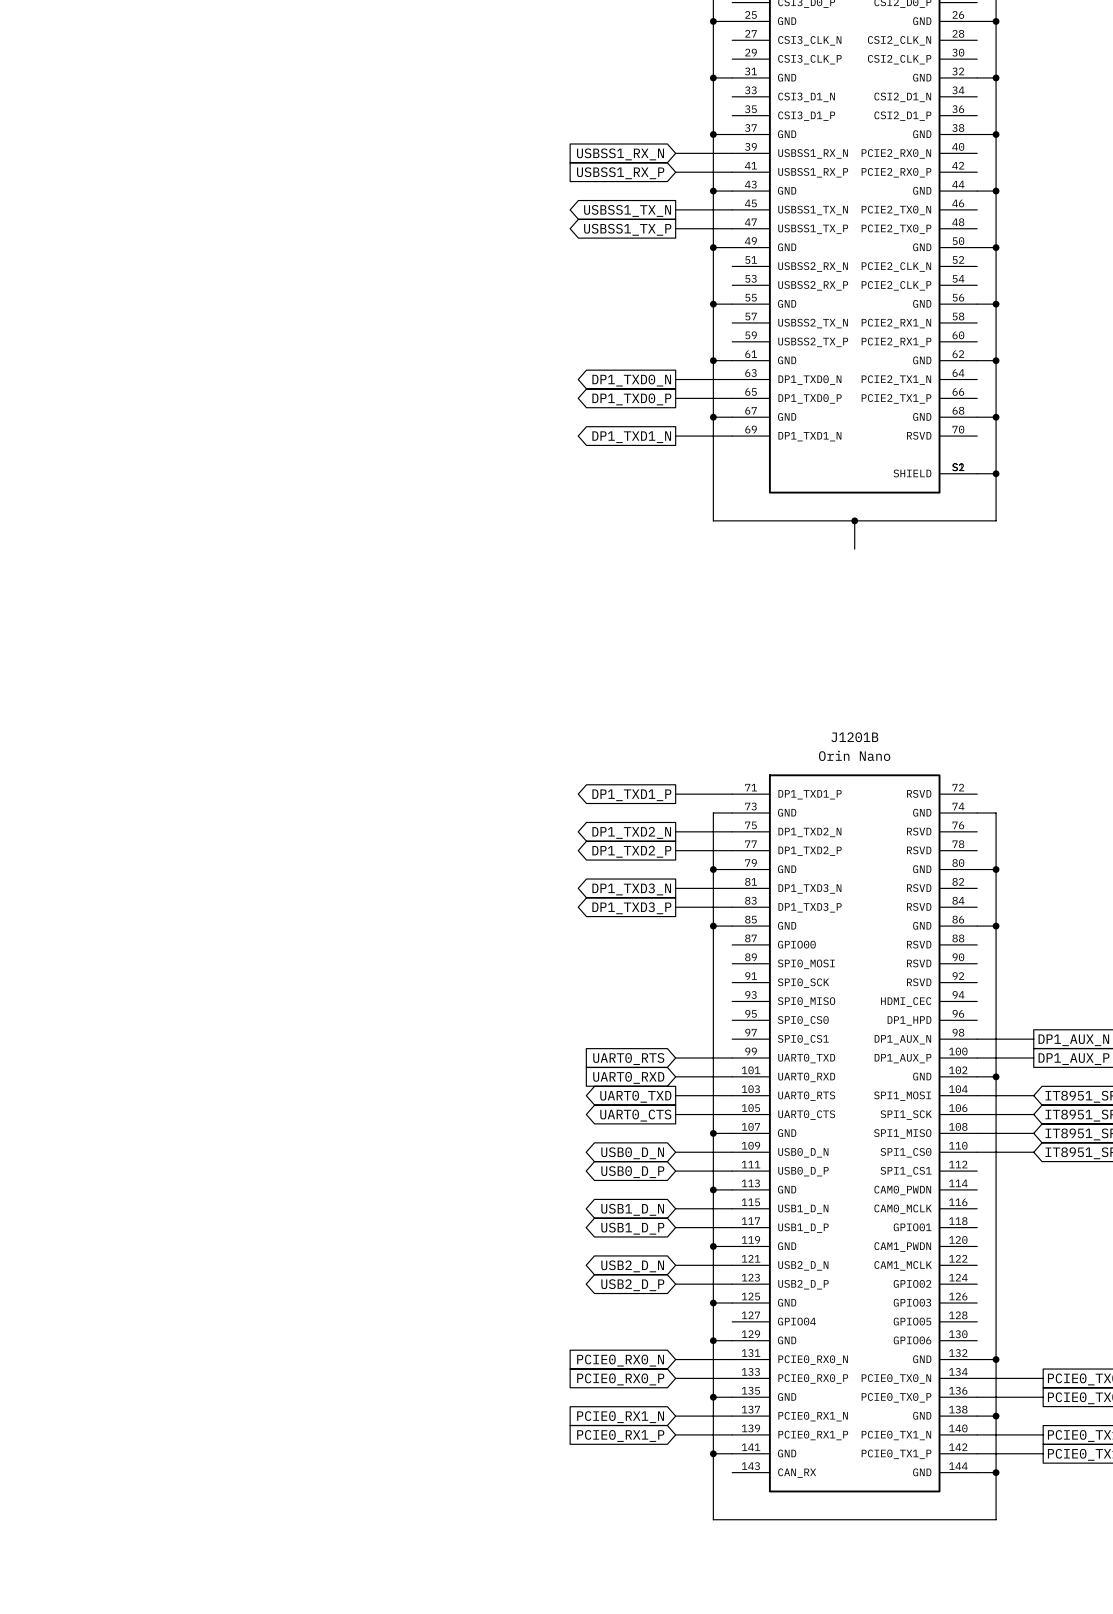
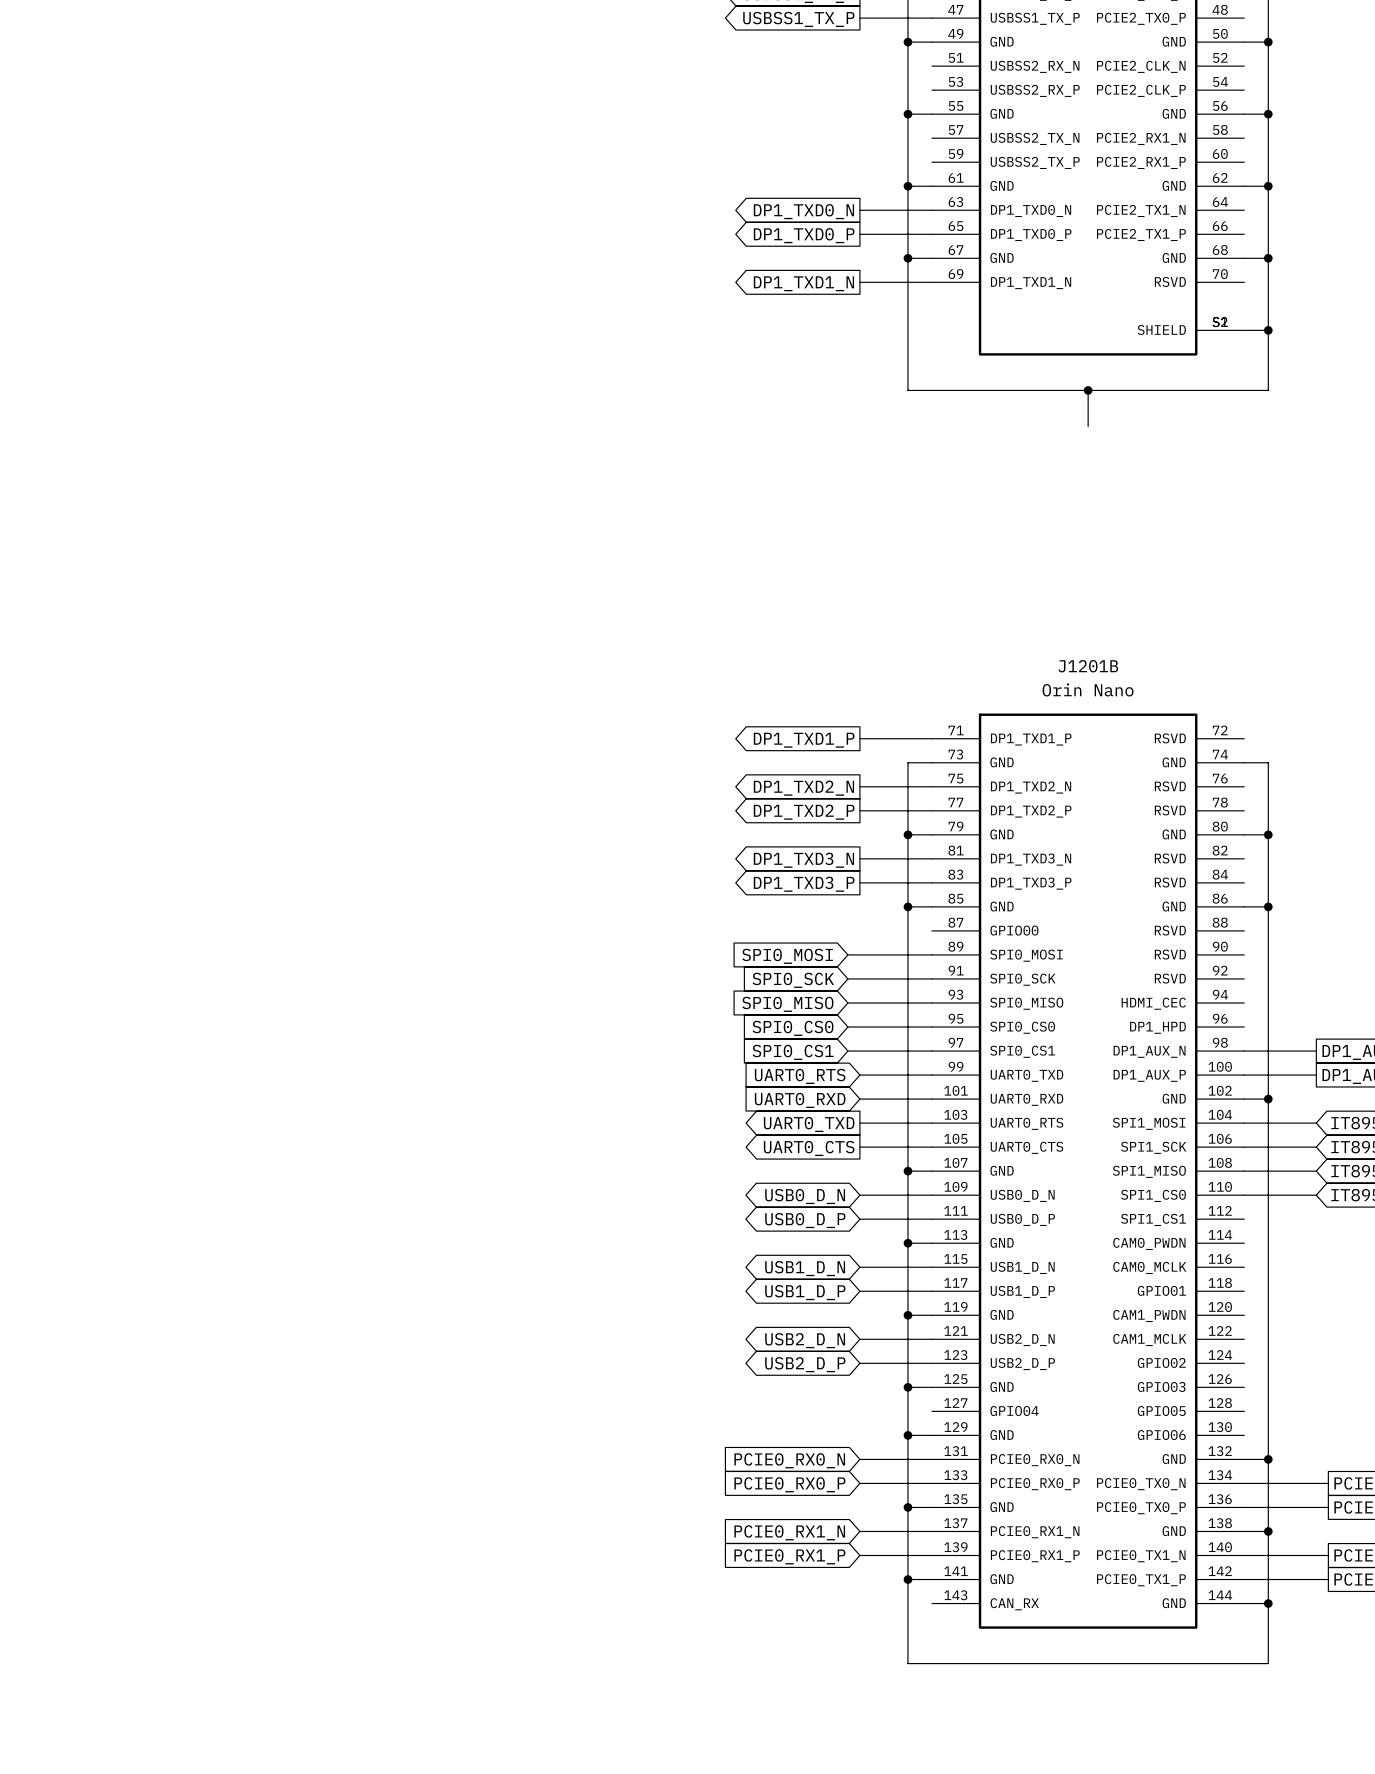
wire: none -> (847, 954) (931, 954)
global label: none -> SPI0_MOSI (787, 956)
wire: none -> (847, 978) (931, 978)
global label: none -> SPI0_SCK (793, 980)
wire: none -> (847, 1002) (931, 1002)
global label: none -> SPI0_MISO (787, 1004)
wire: none -> (847, 1027) (931, 1027)
global label: none -> SPI0_CS0 (793, 1028)
wire: none -> (847, 1051) (931, 1051)
global label: none -> SPI0_CS1 (793, 1052)

